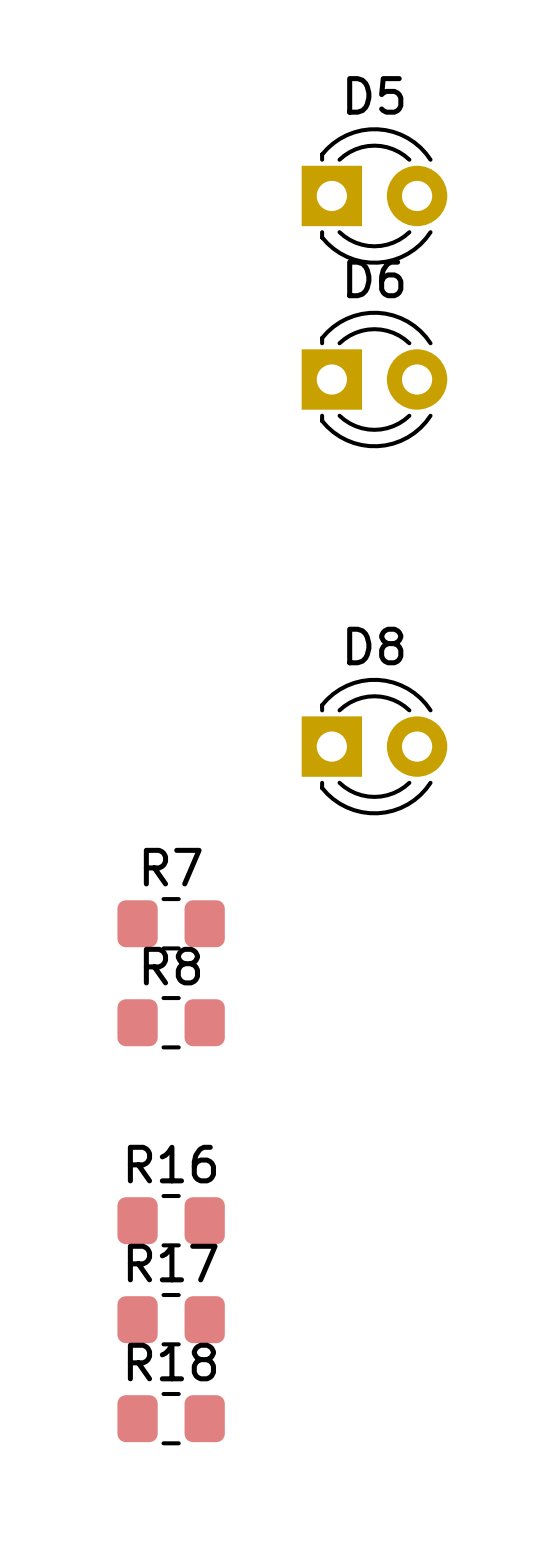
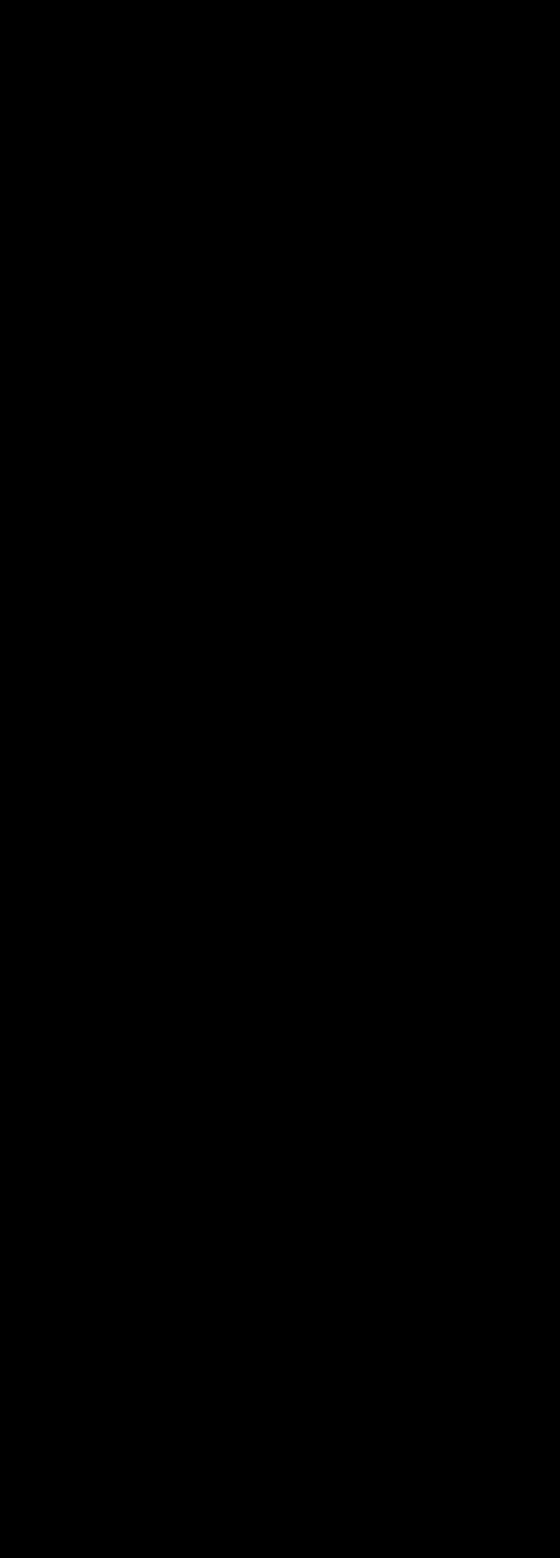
D5: (374, 195) -> none
D6: (374, 379) -> none
D8: (374, 746) -> none
R7: (171, 923) -> none
R8: (171, 1022) -> none
R16: (171, 1220) -> none
R17: (171, 1319) -> none
R18: (171, 1418) -> none

